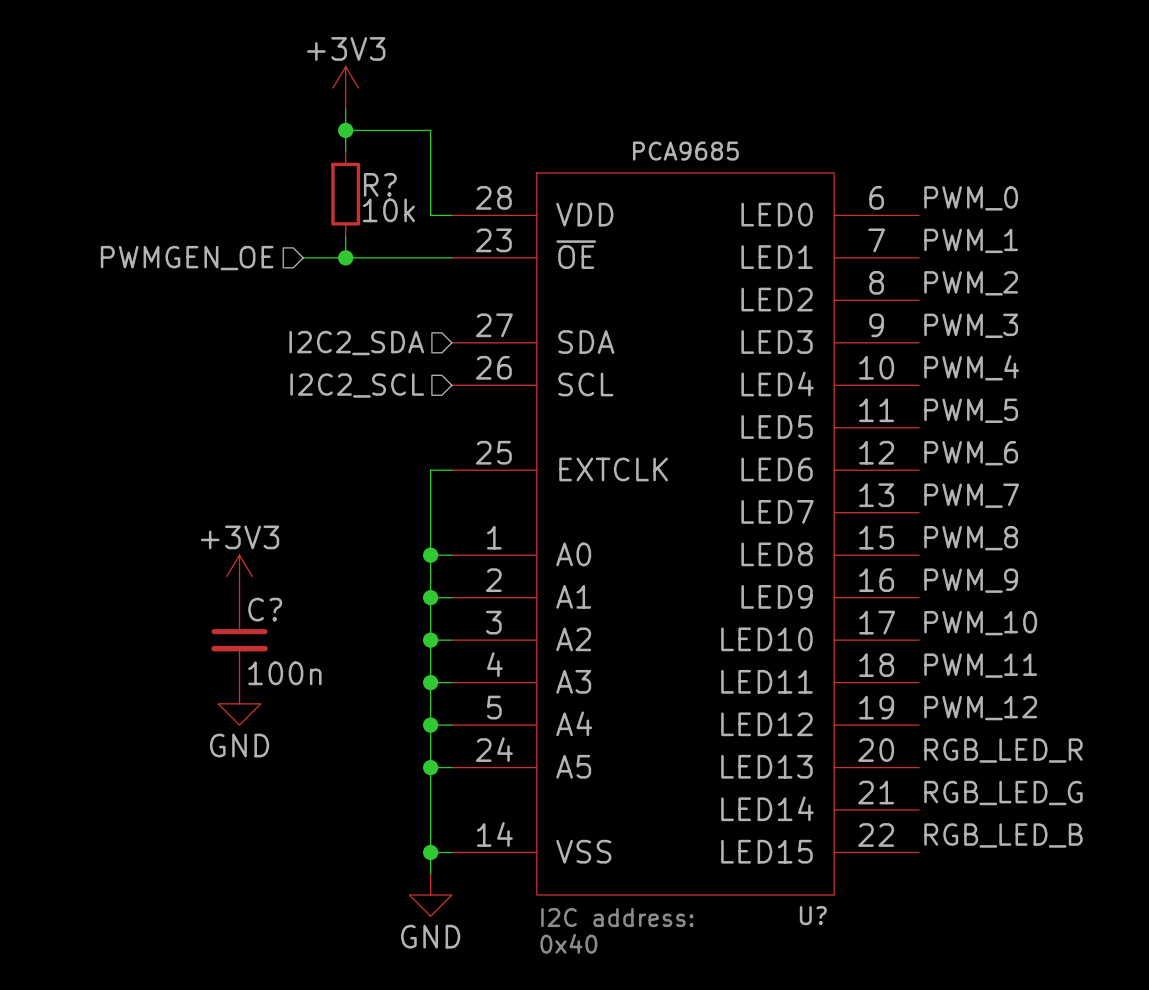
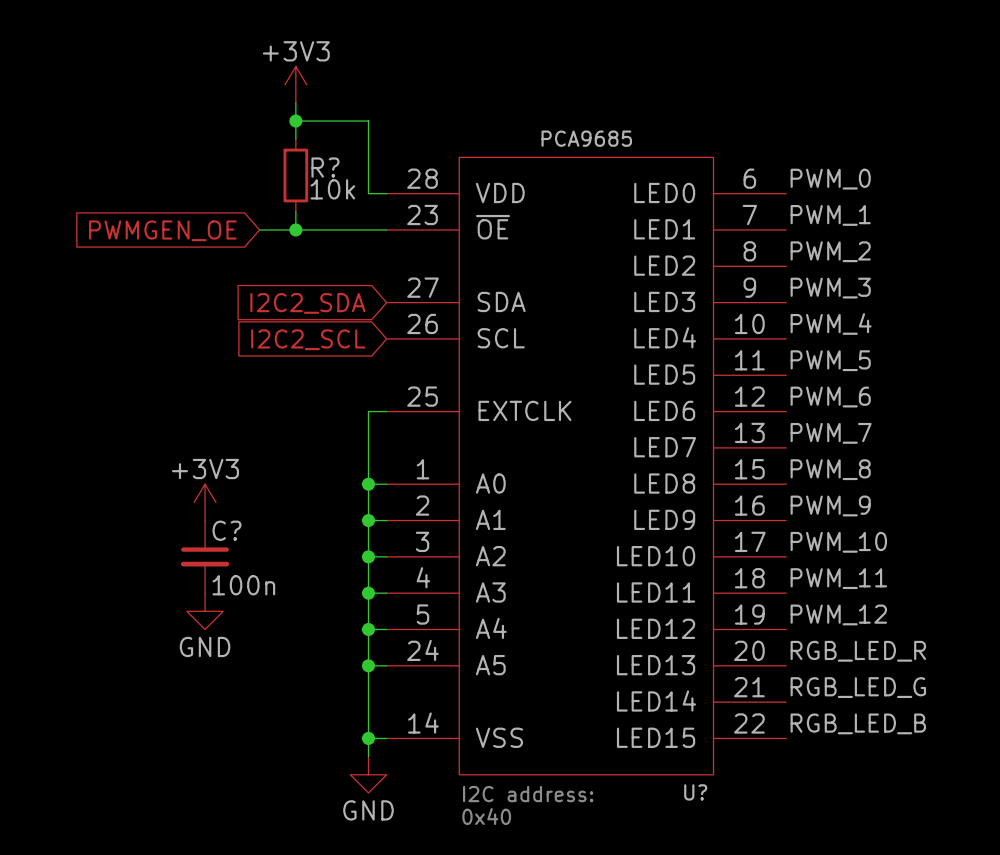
hierarchical label: PWMGEN_OE (187, 258) -> none
global label: none -> PWMGEN_OE (162, 230)
hierarchical label: I2C2_SDA (356, 343) -> none
global label: none -> I2C2_SDA (307, 303)
hierarchical label: I2C2_SCL (357, 385) -> none
global label: none -> I2C2_SCL (308, 339)

